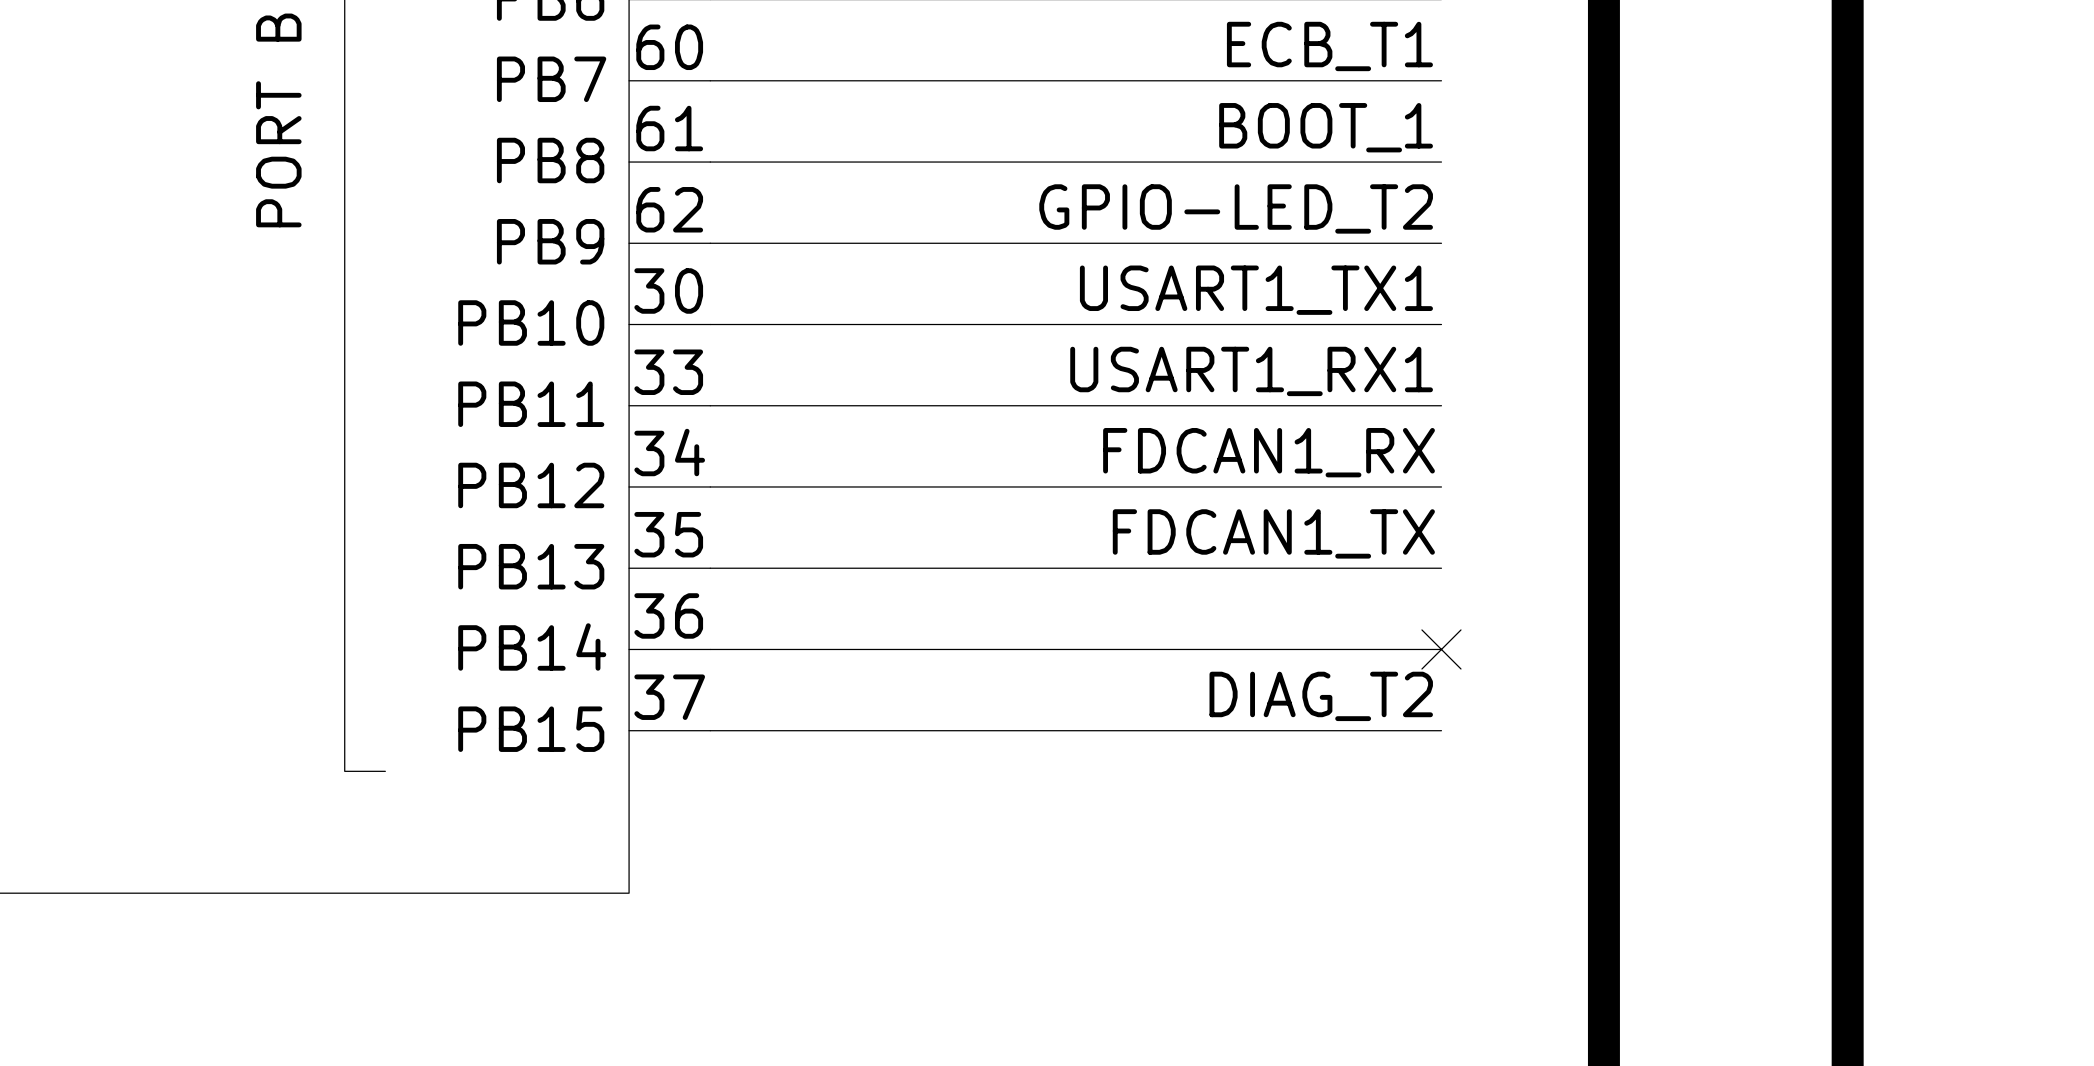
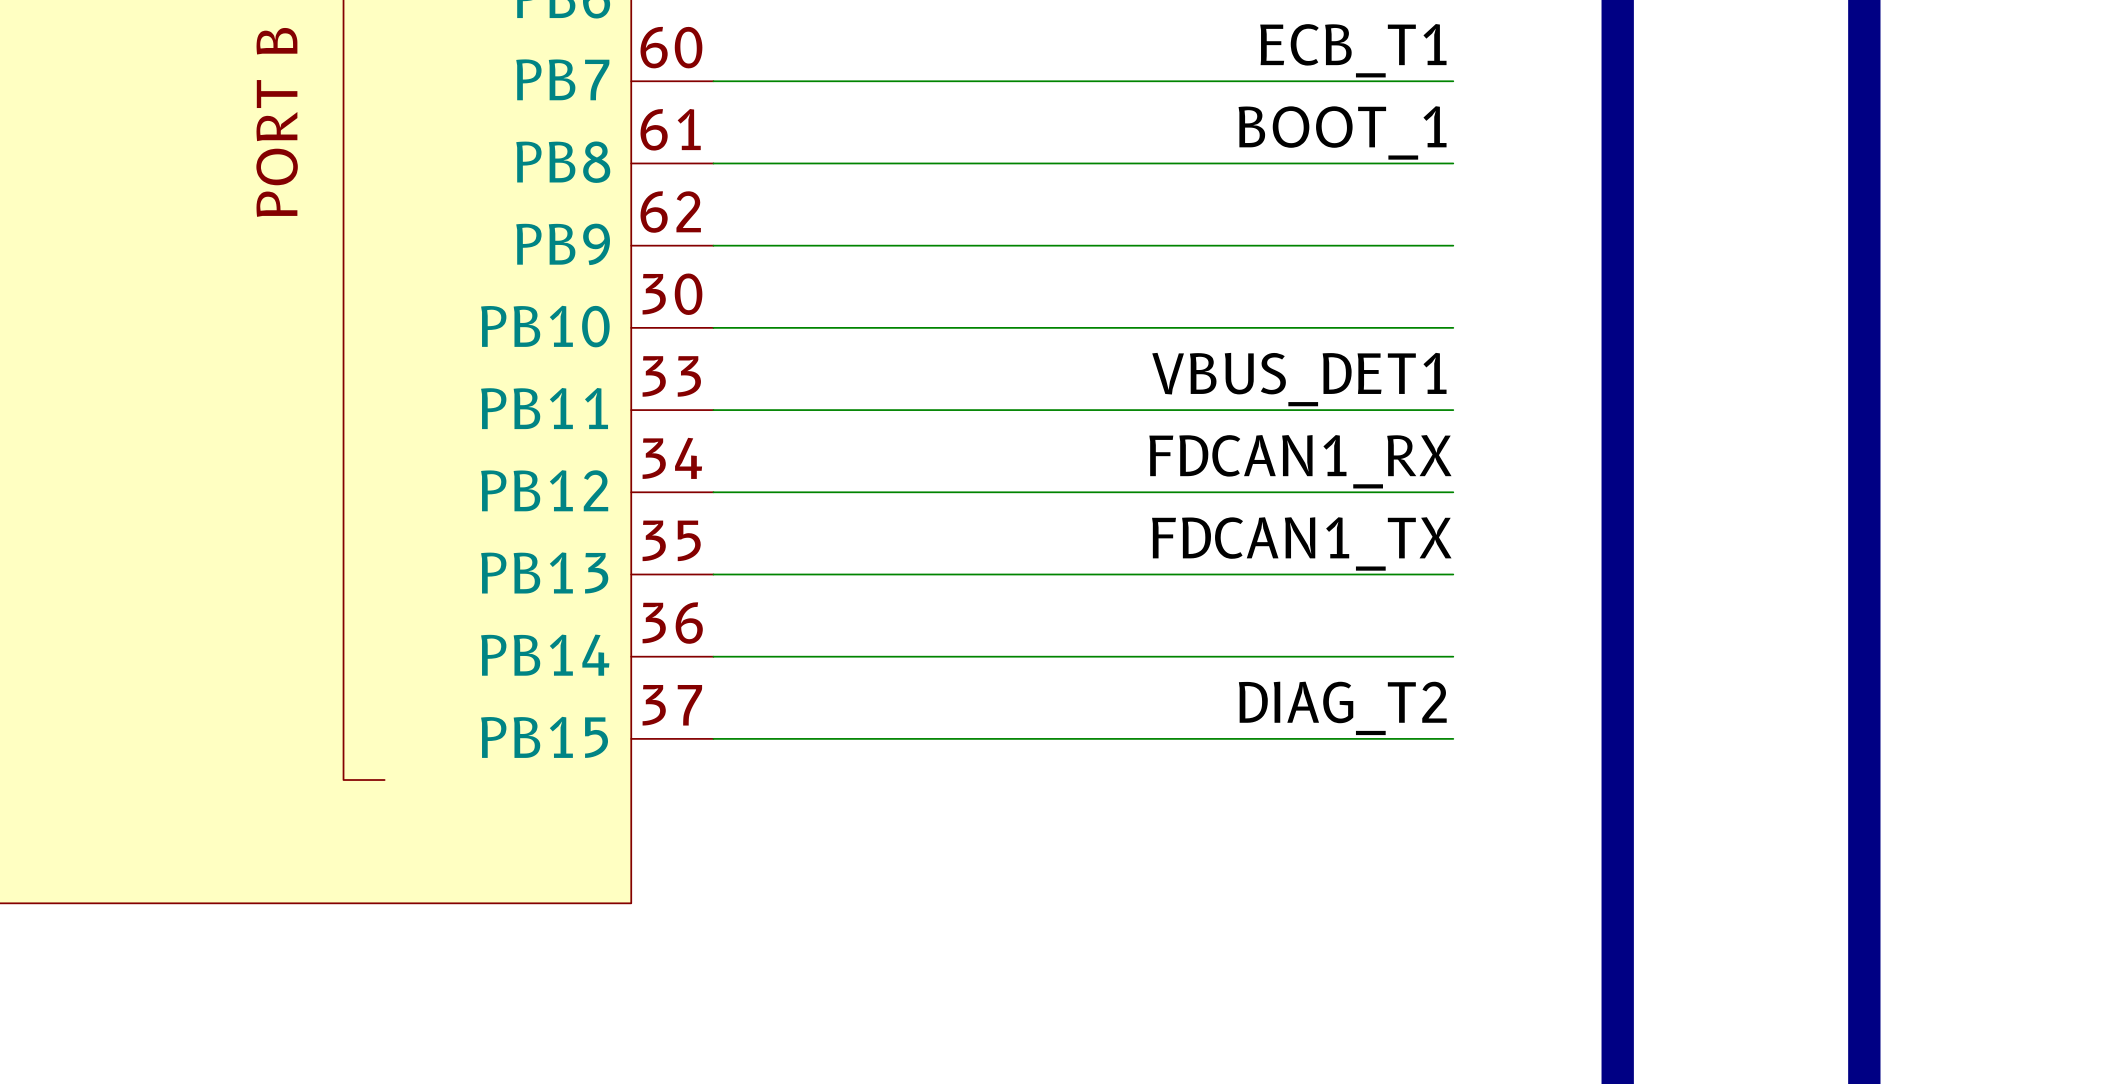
label: GPIO-LED_T2 (1236, 208) -> none
label: USART1_TX1 (1256, 290) -> none
label: USART1_RX1 (1251, 371) -> VBUS_DET1 (1299, 379)
no-connect mark: (1441, 649) -> none

